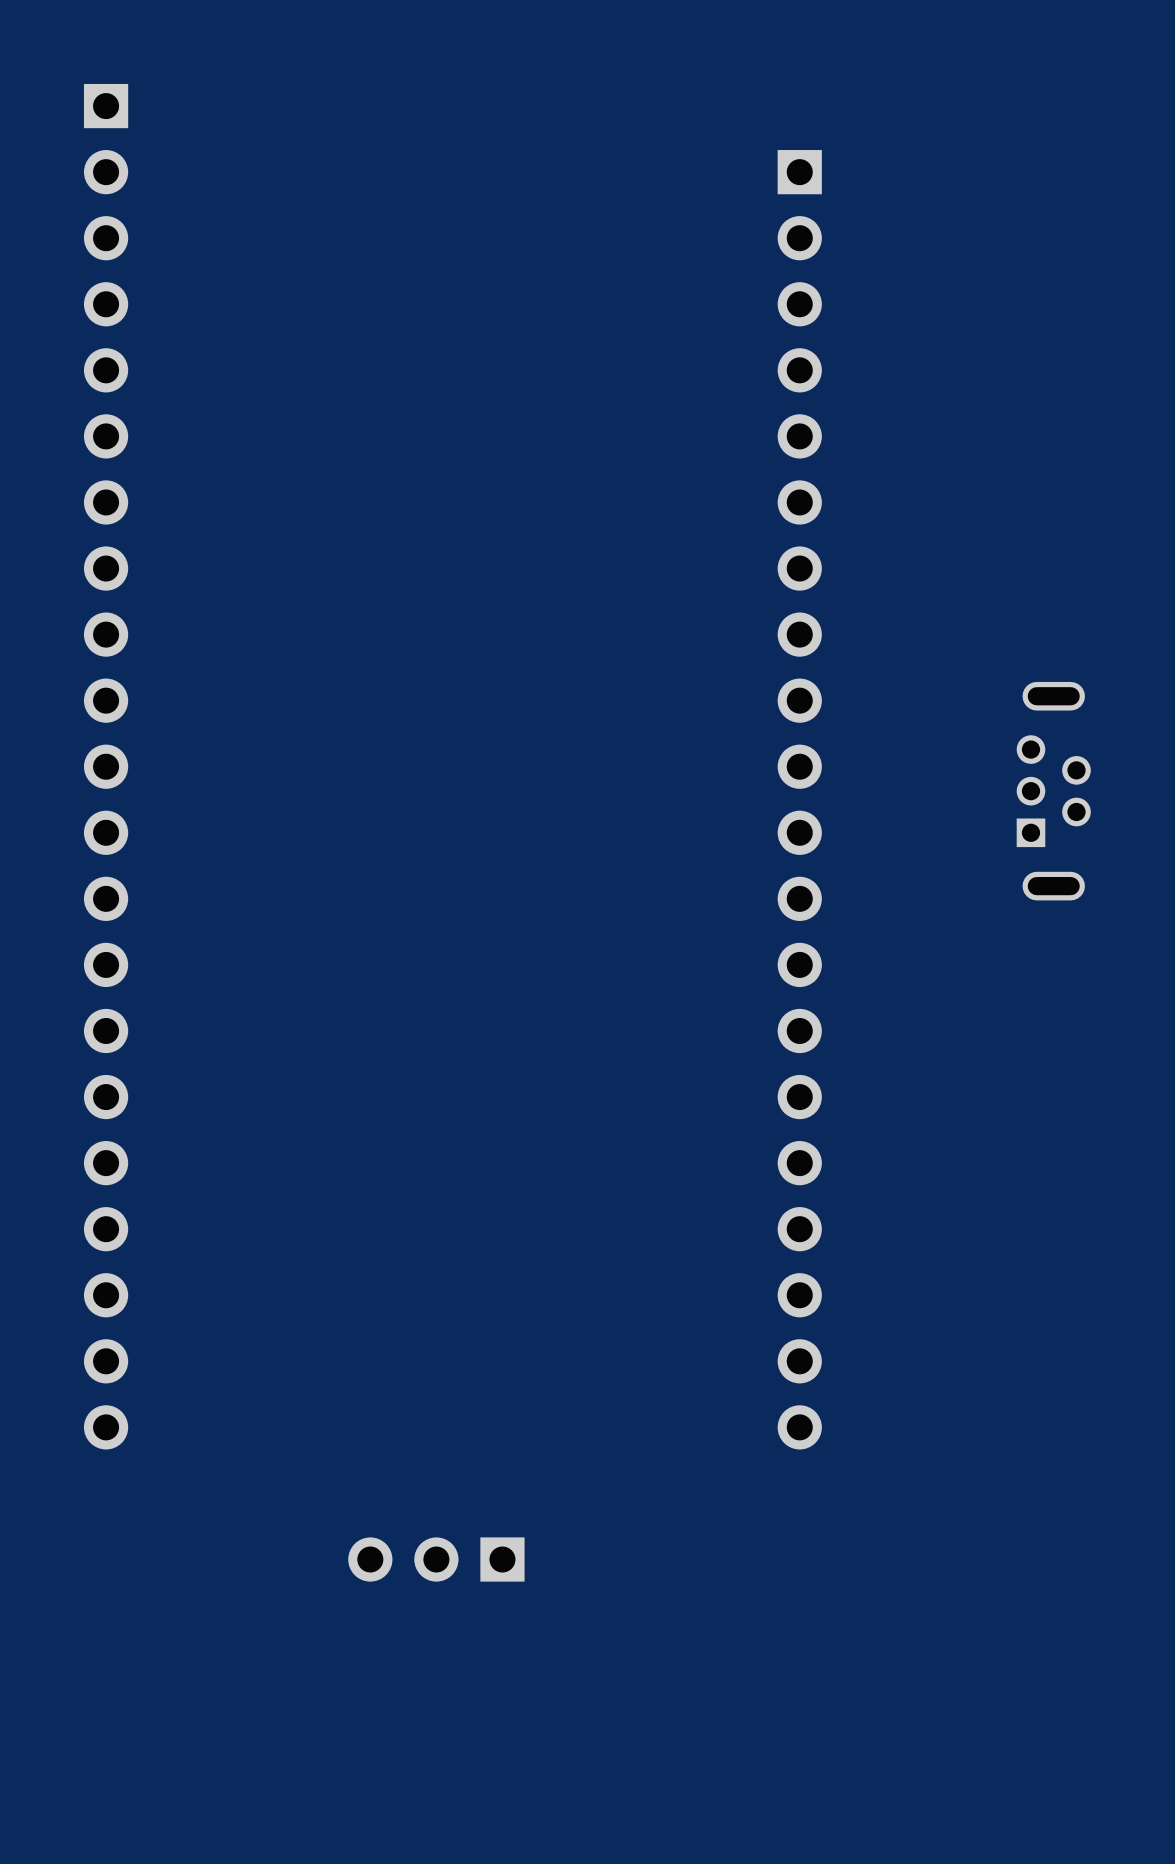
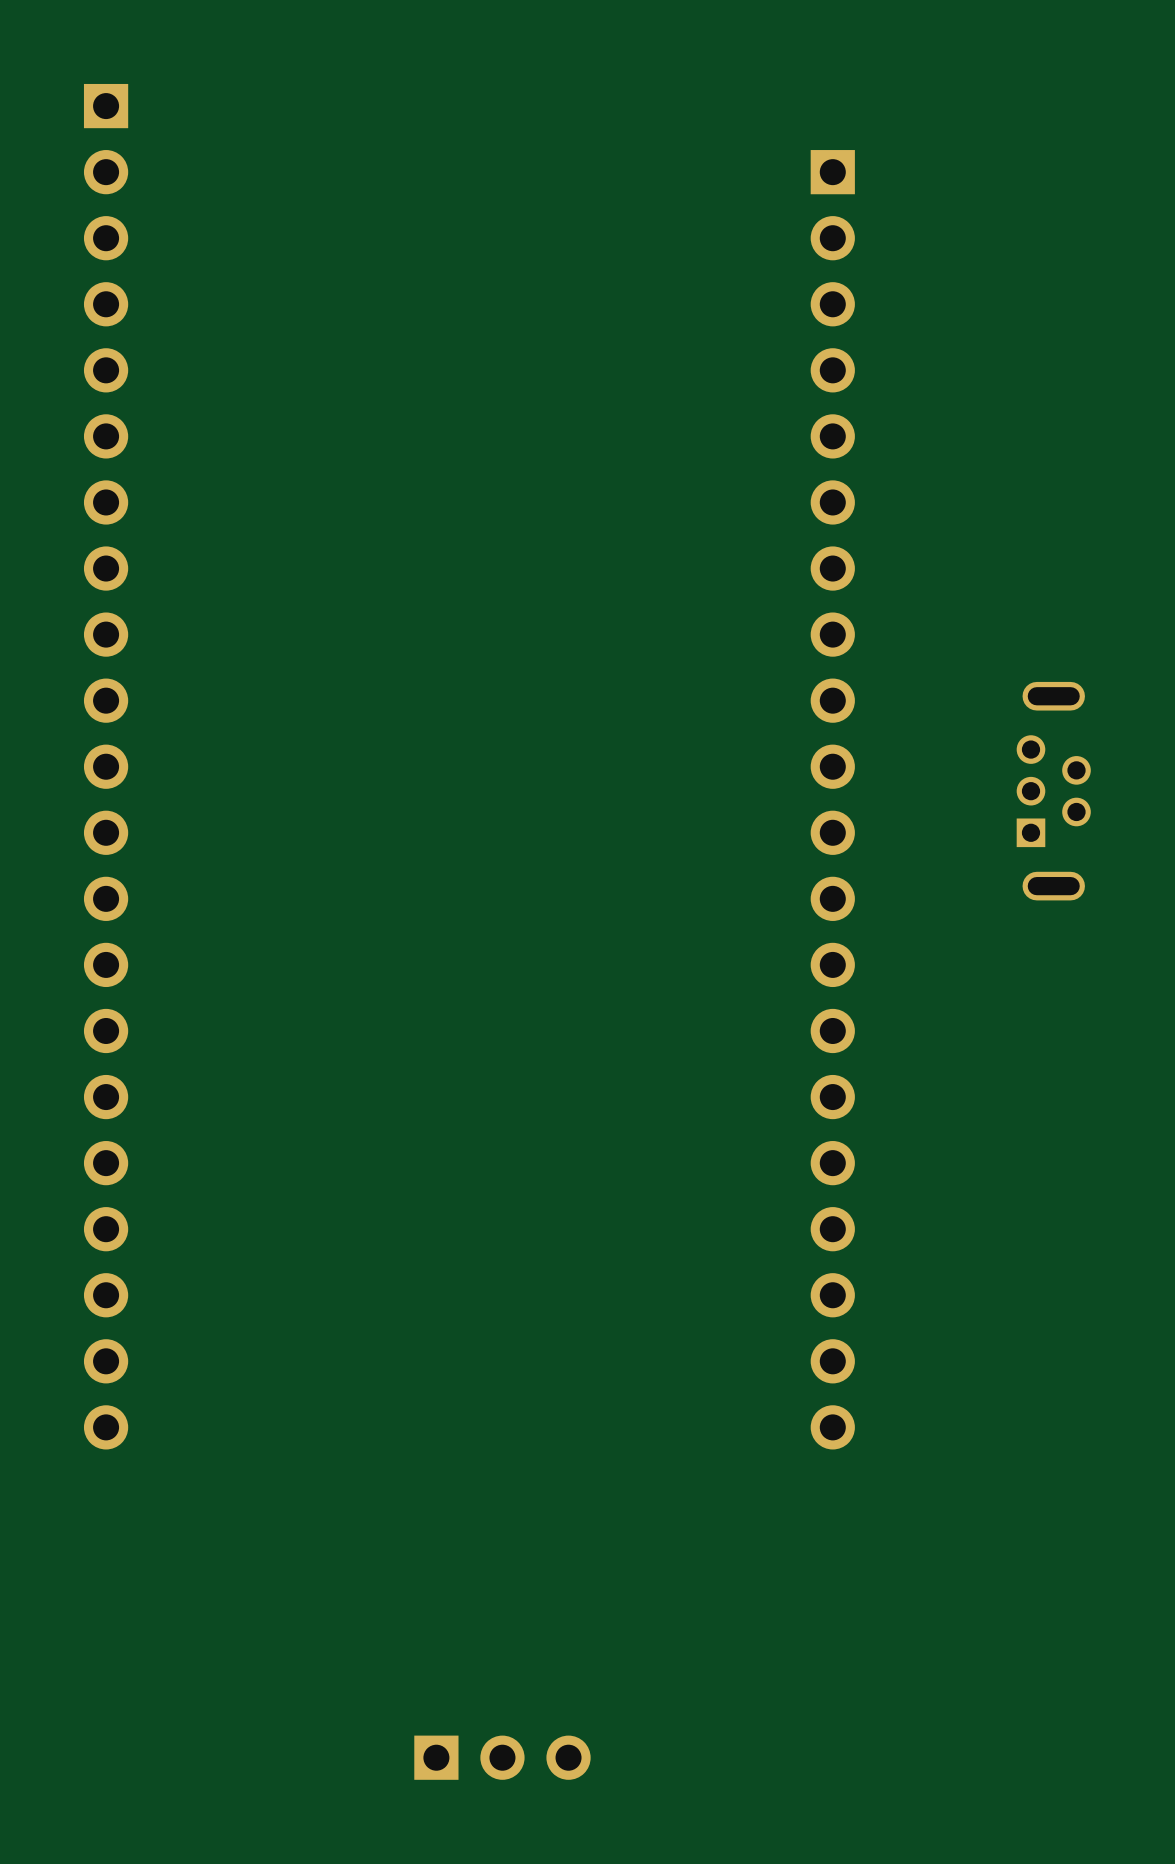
part position: (799, 799) -> (832, 799)
part rotation: 0° (436, 1559) -> 180° (502, 1757)
part position: (436, 1559) -> (502, 1757)

